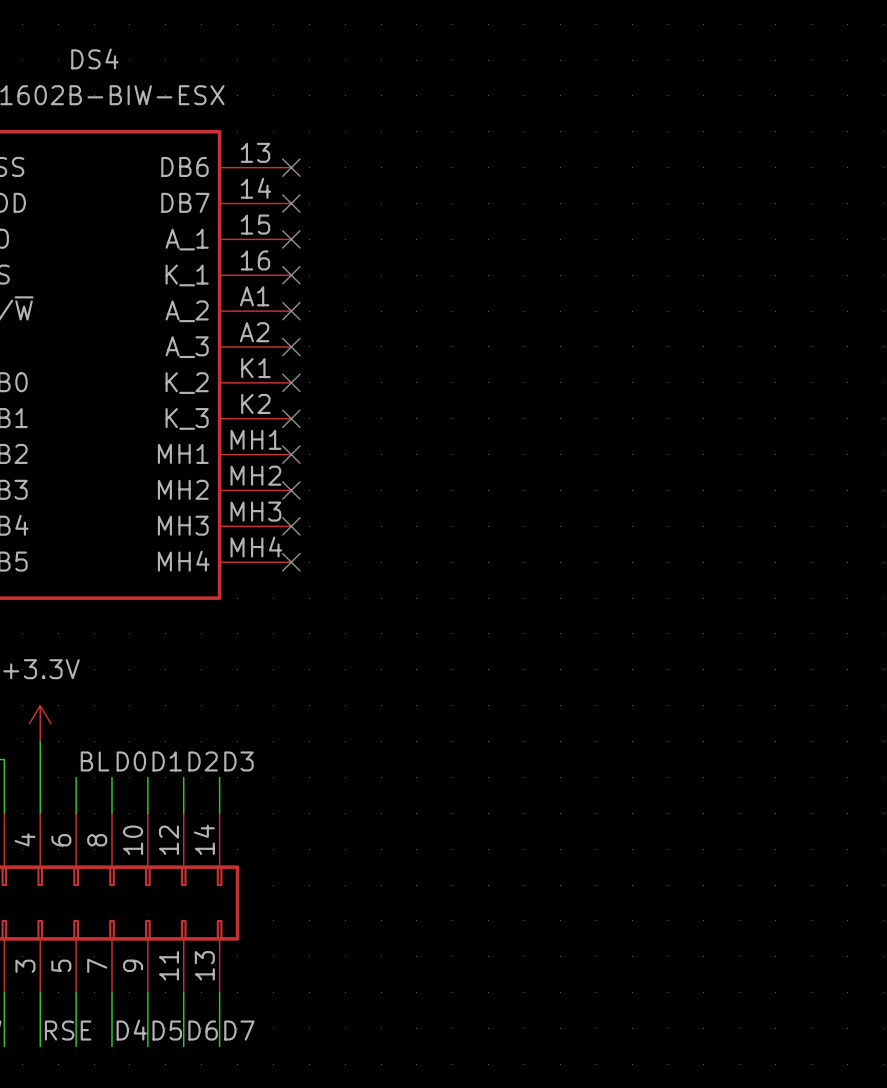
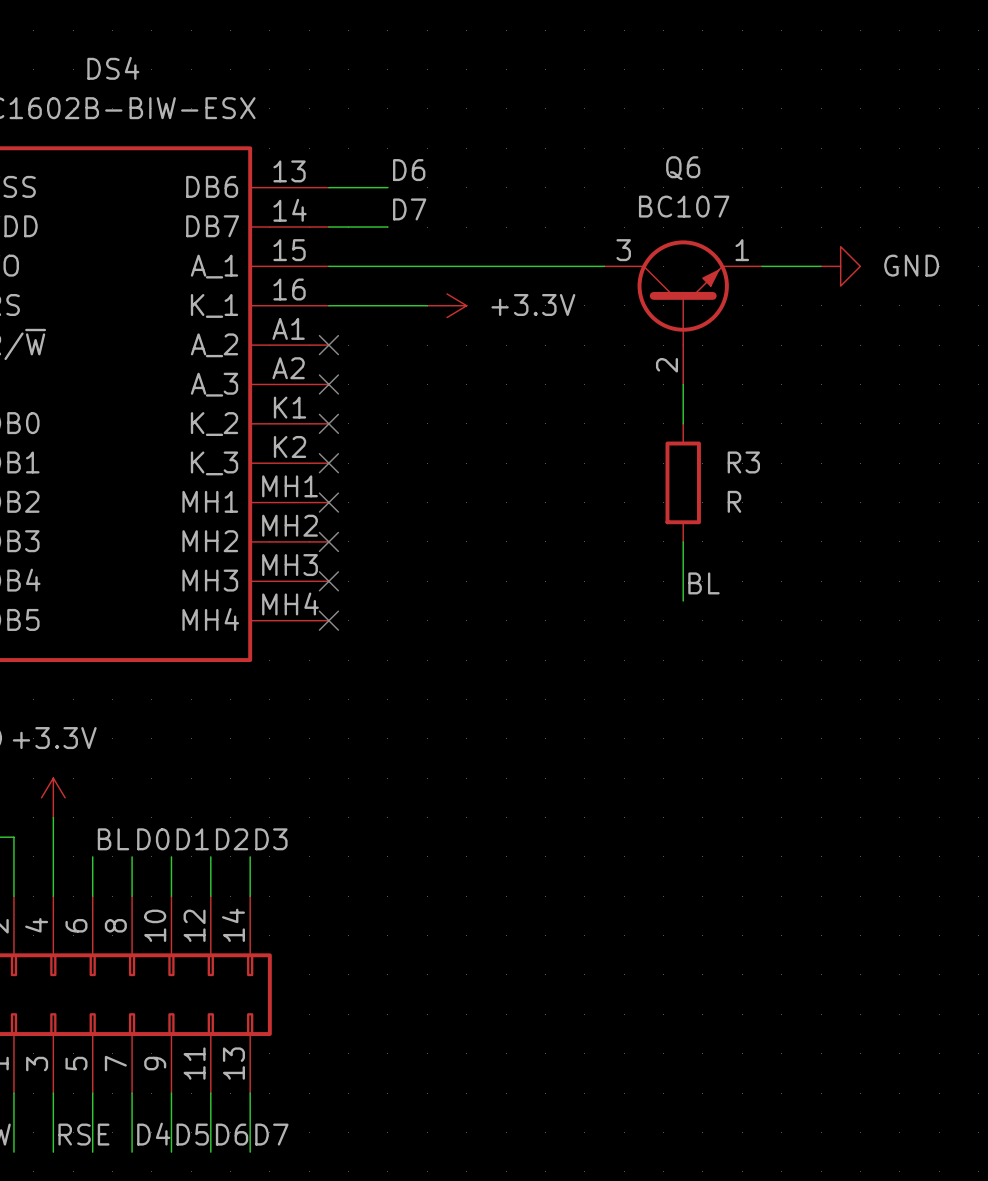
label: none -> D6 (409, 170)
wire: none -> (328, 187) (387, 187)
no-connect mark: (291, 167) -> none
label: none -> D7 (409, 209)
wire: none -> (328, 227) (387, 227)
no-connect mark: (291, 203) -> none
wire: none -> (328, 266) (604, 266)
no-connect mark: (291, 239) -> none
wire: none -> (761, 266) (821, 266)
power symbol: none -> GND (840, 266)
wire: none -> (328, 305) (427, 305)
no-connect mark: (291, 275) -> none
power symbol: none -> +3.3V (447, 305)
Q6: none -> BC107 (683, 312)
wire: none -> (683, 384) (683, 423)
R3: none -> R (683, 482)
wire: none -> (683, 541) (683, 600)
label: none -> BL (703, 583)

